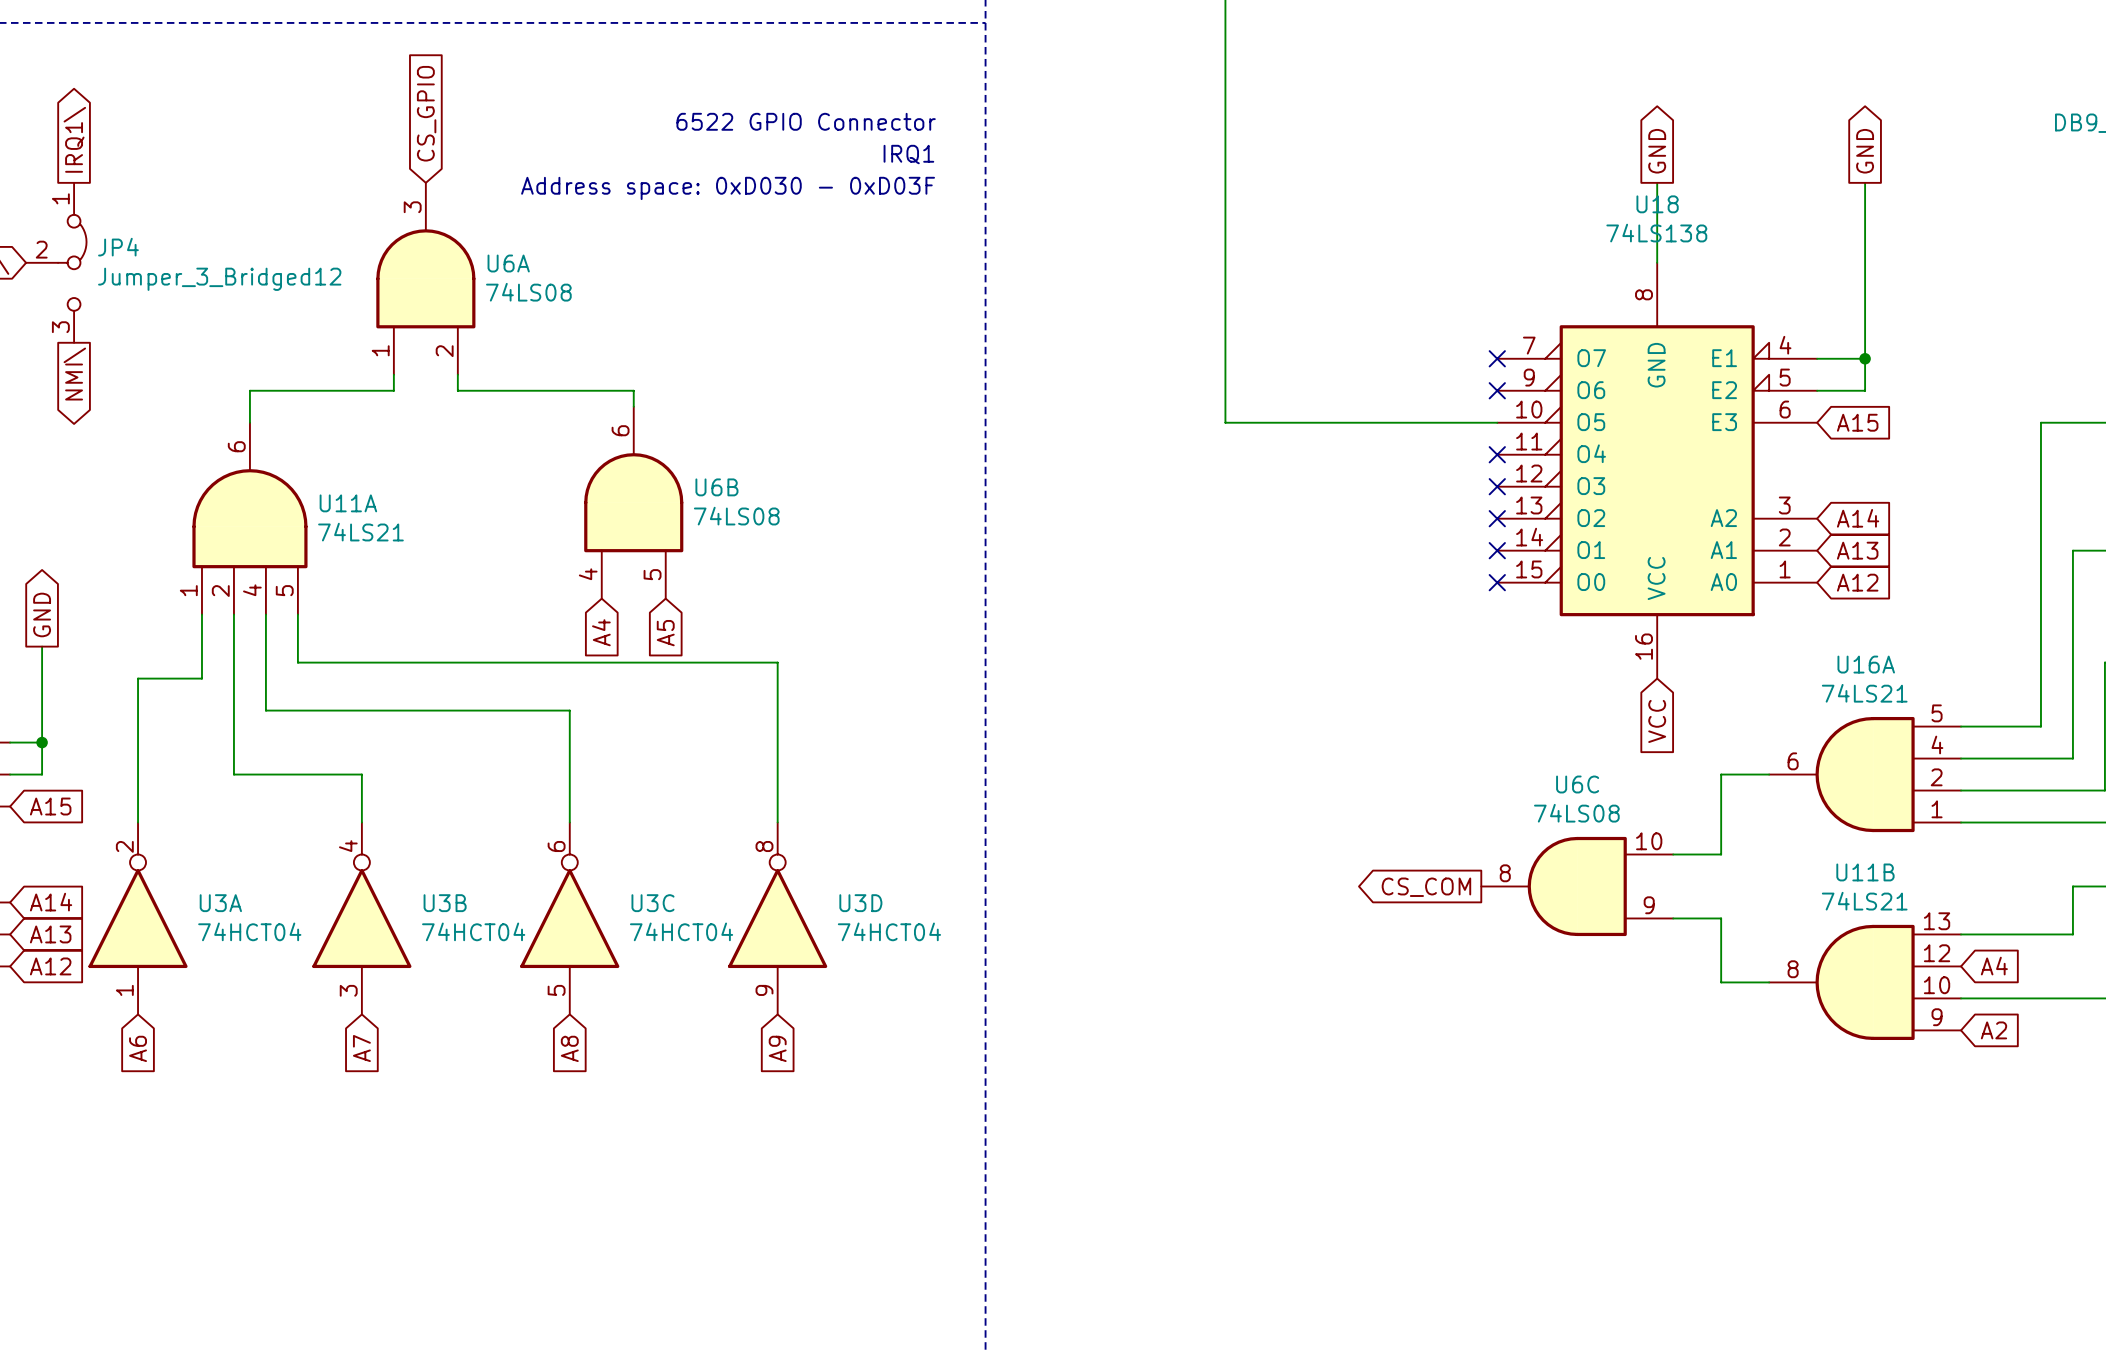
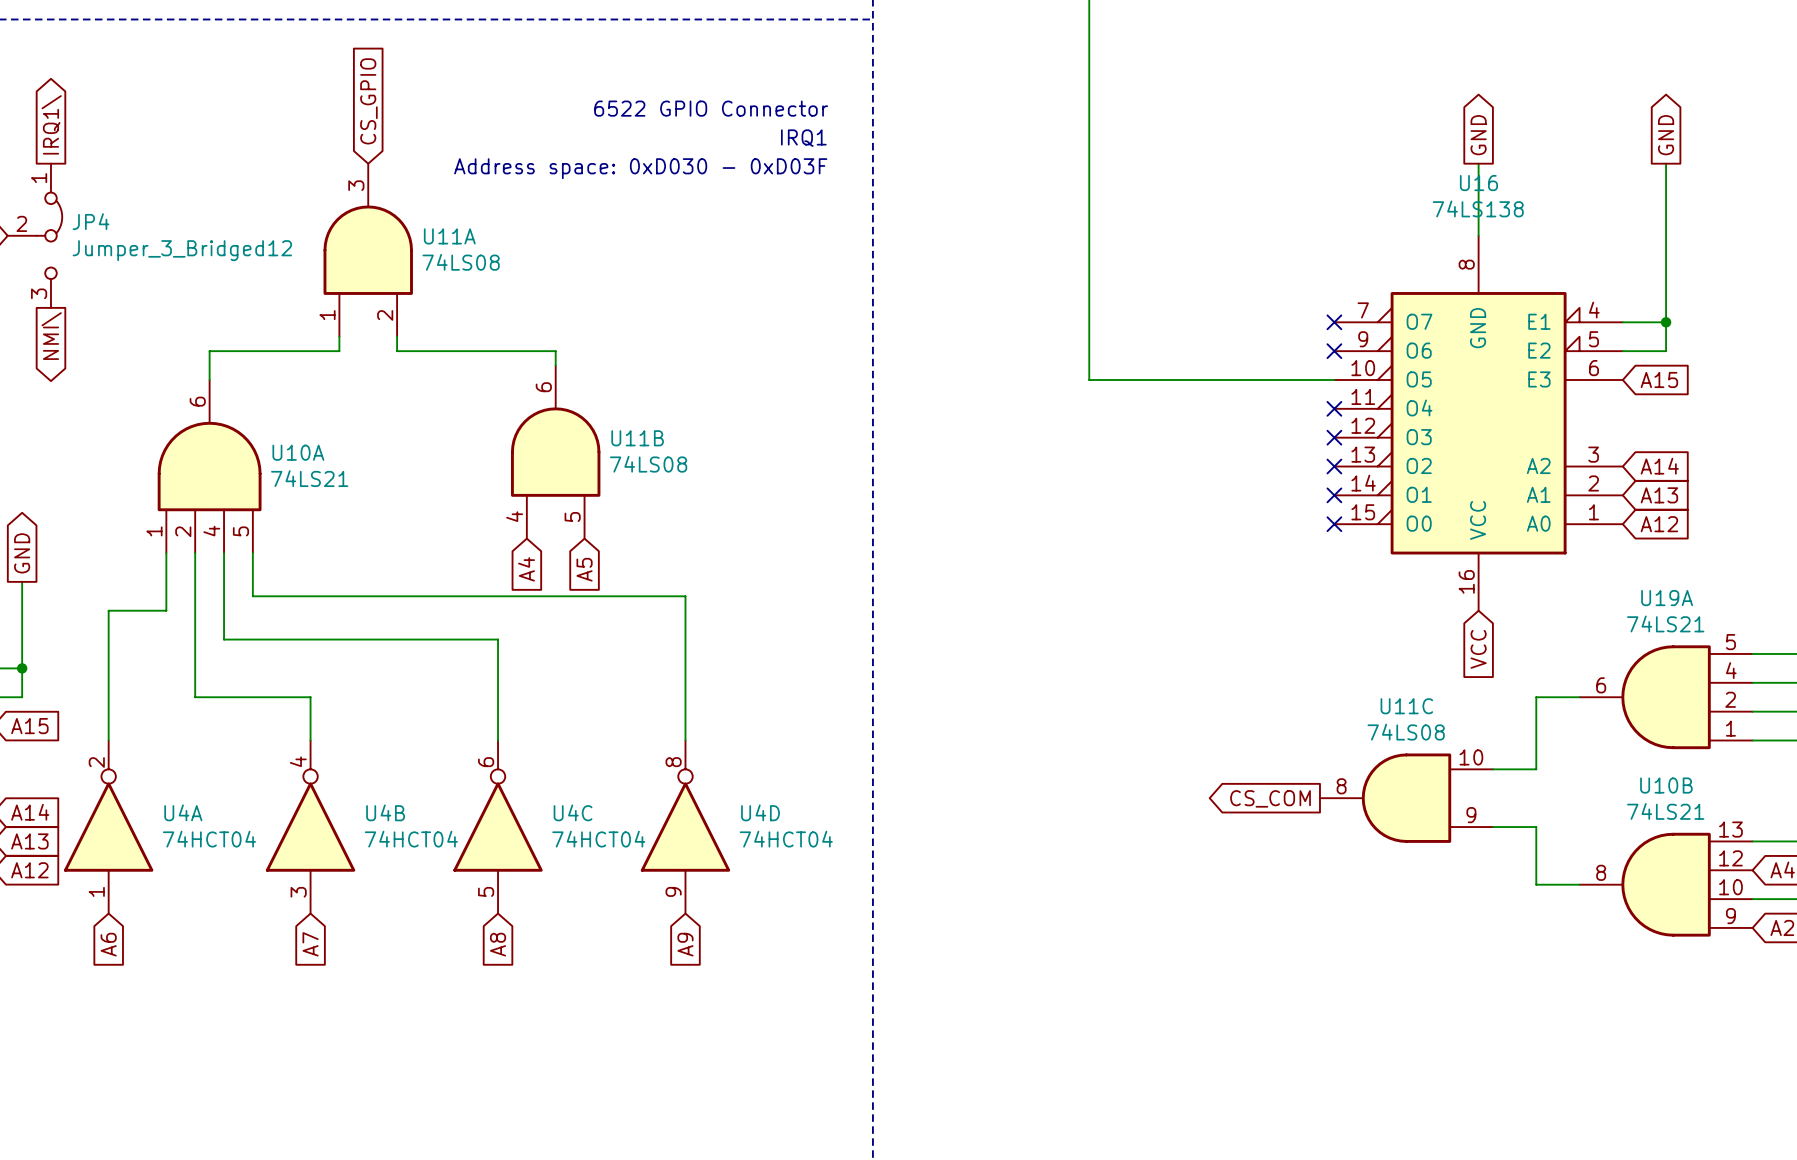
U18 name: U18 (1657, 204) -> U16 (1478, 183)
U6A name: U6A (508, 263) -> U11A (449, 236)
U6B name: U6B (716, 487) -> U11B (637, 438)
U11A name: U11A (348, 503) -> U10A (298, 452)
U16A name: U16A (1866, 664) -> U19A (1667, 598)
U6C name: U6C (1577, 784) -> U11C (1406, 706)
U11B name: U11B (1865, 872) -> U10B (1666, 785)
U3A name: U3A (220, 903) -> U4A (183, 812)
U3B name: U3B (445, 903) -> U4B (385, 812)
U3C name: U3C (652, 903) -> U4C (573, 812)
U3D name: U3D (860, 903) -> U4D (760, 812)

